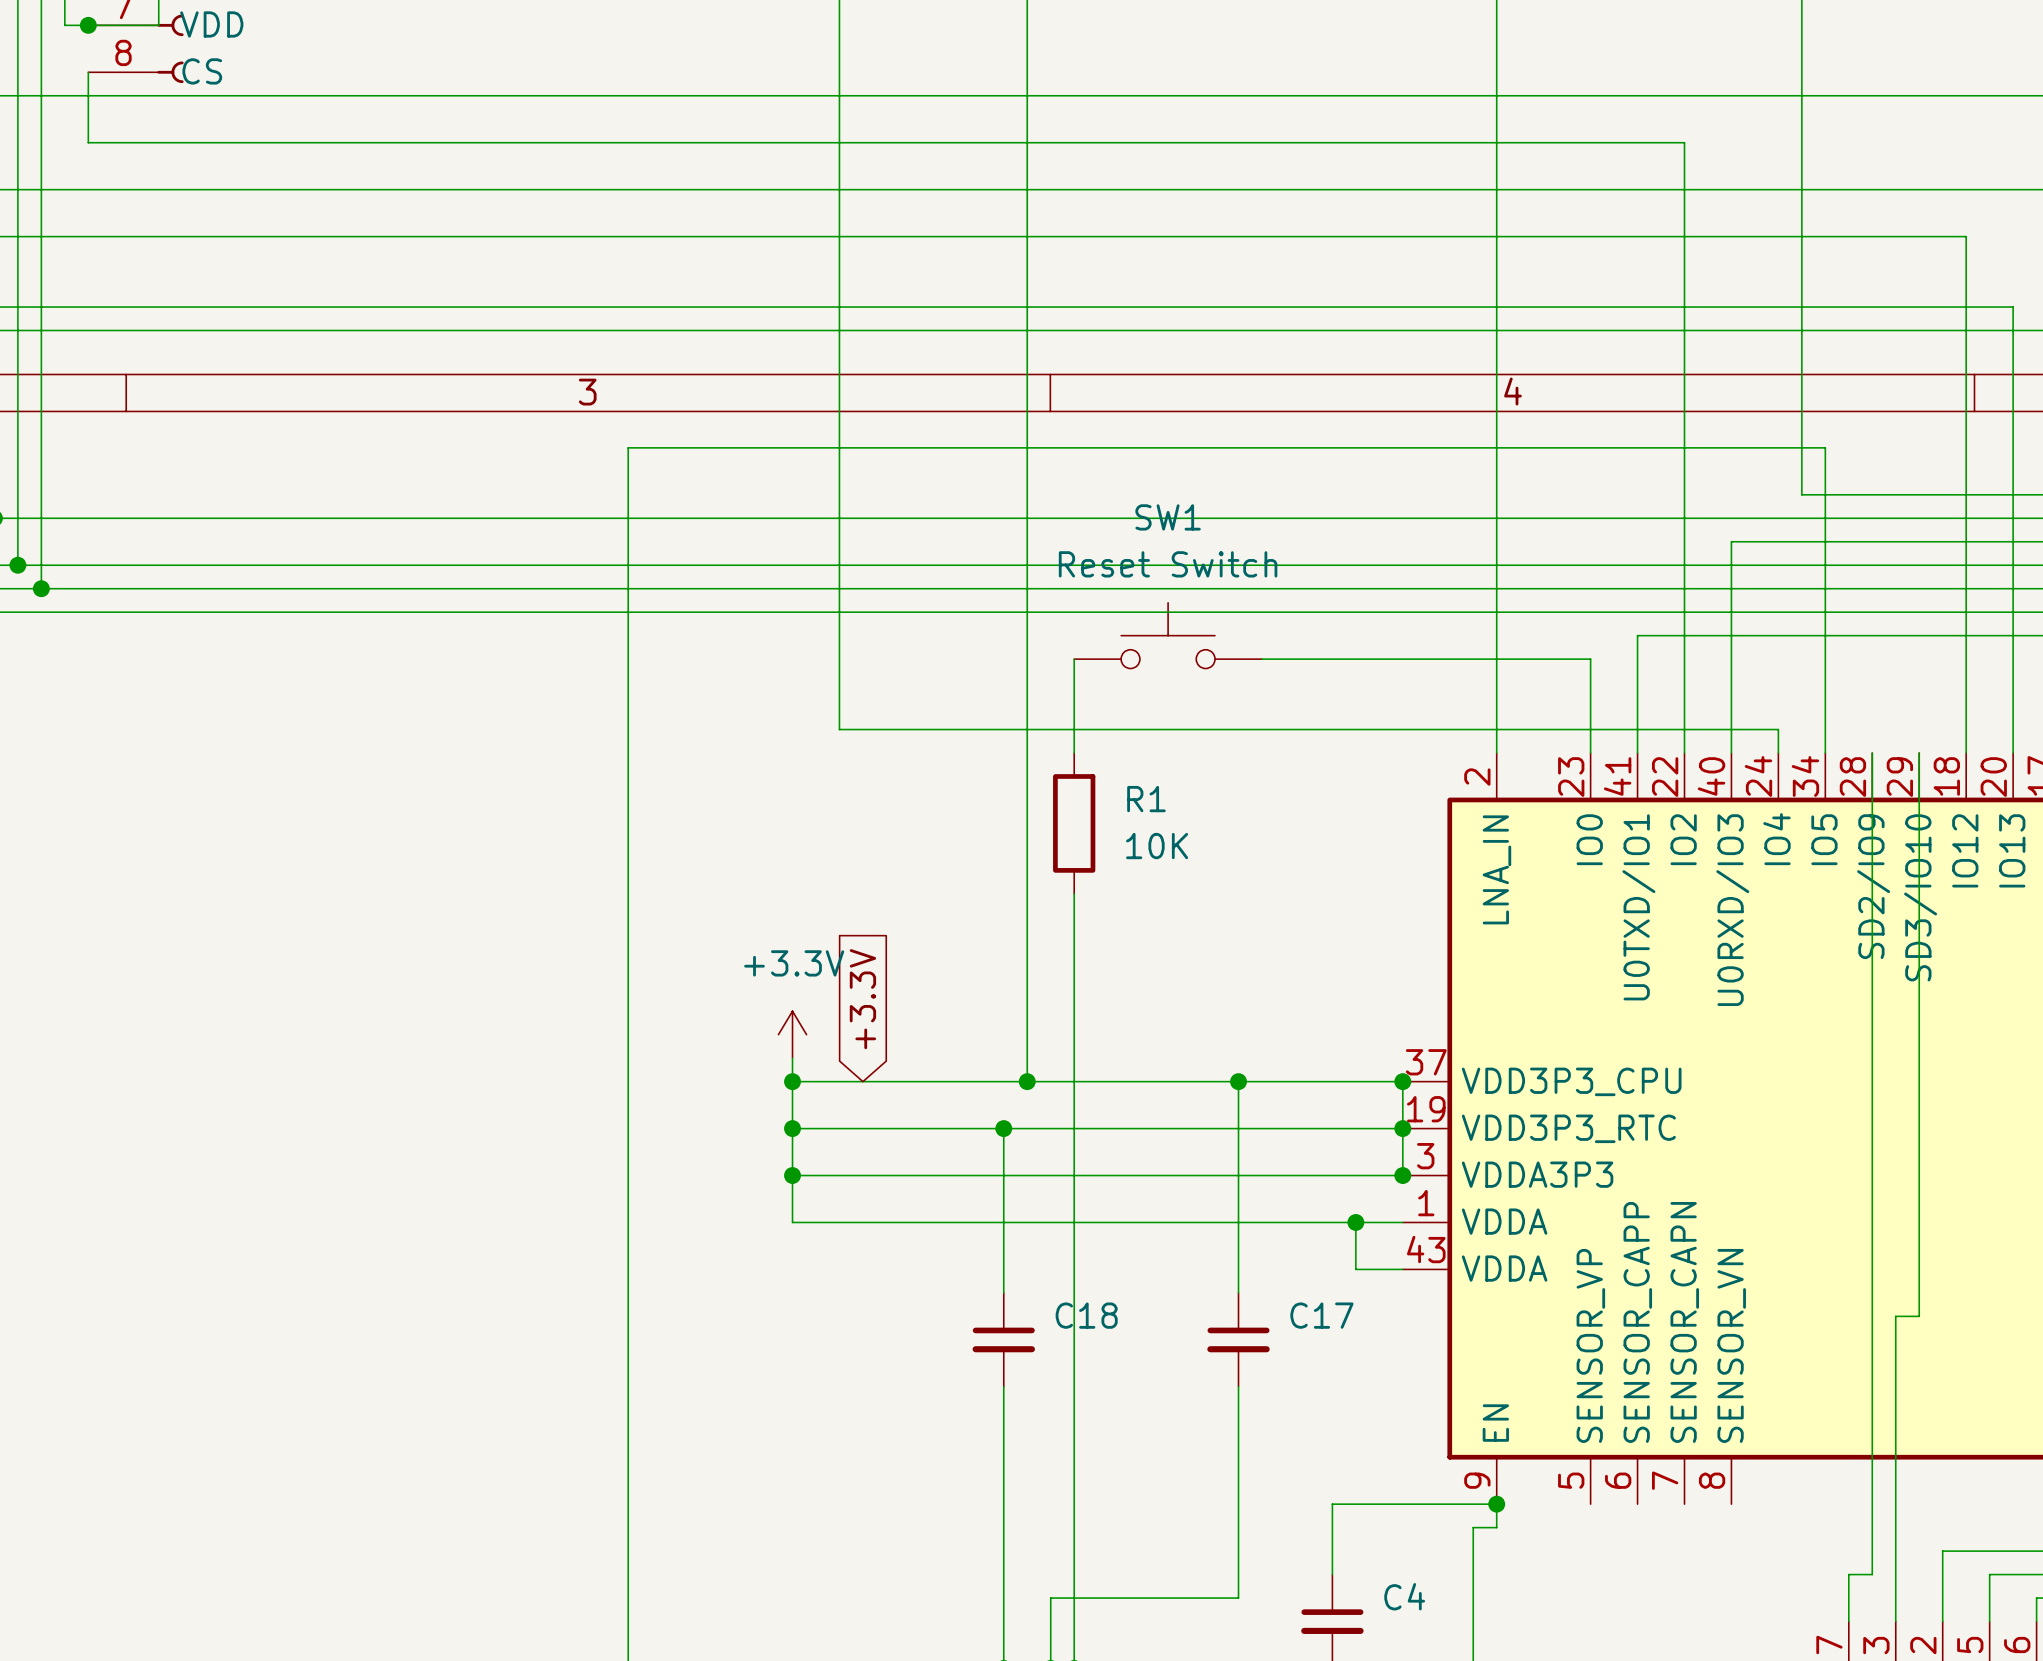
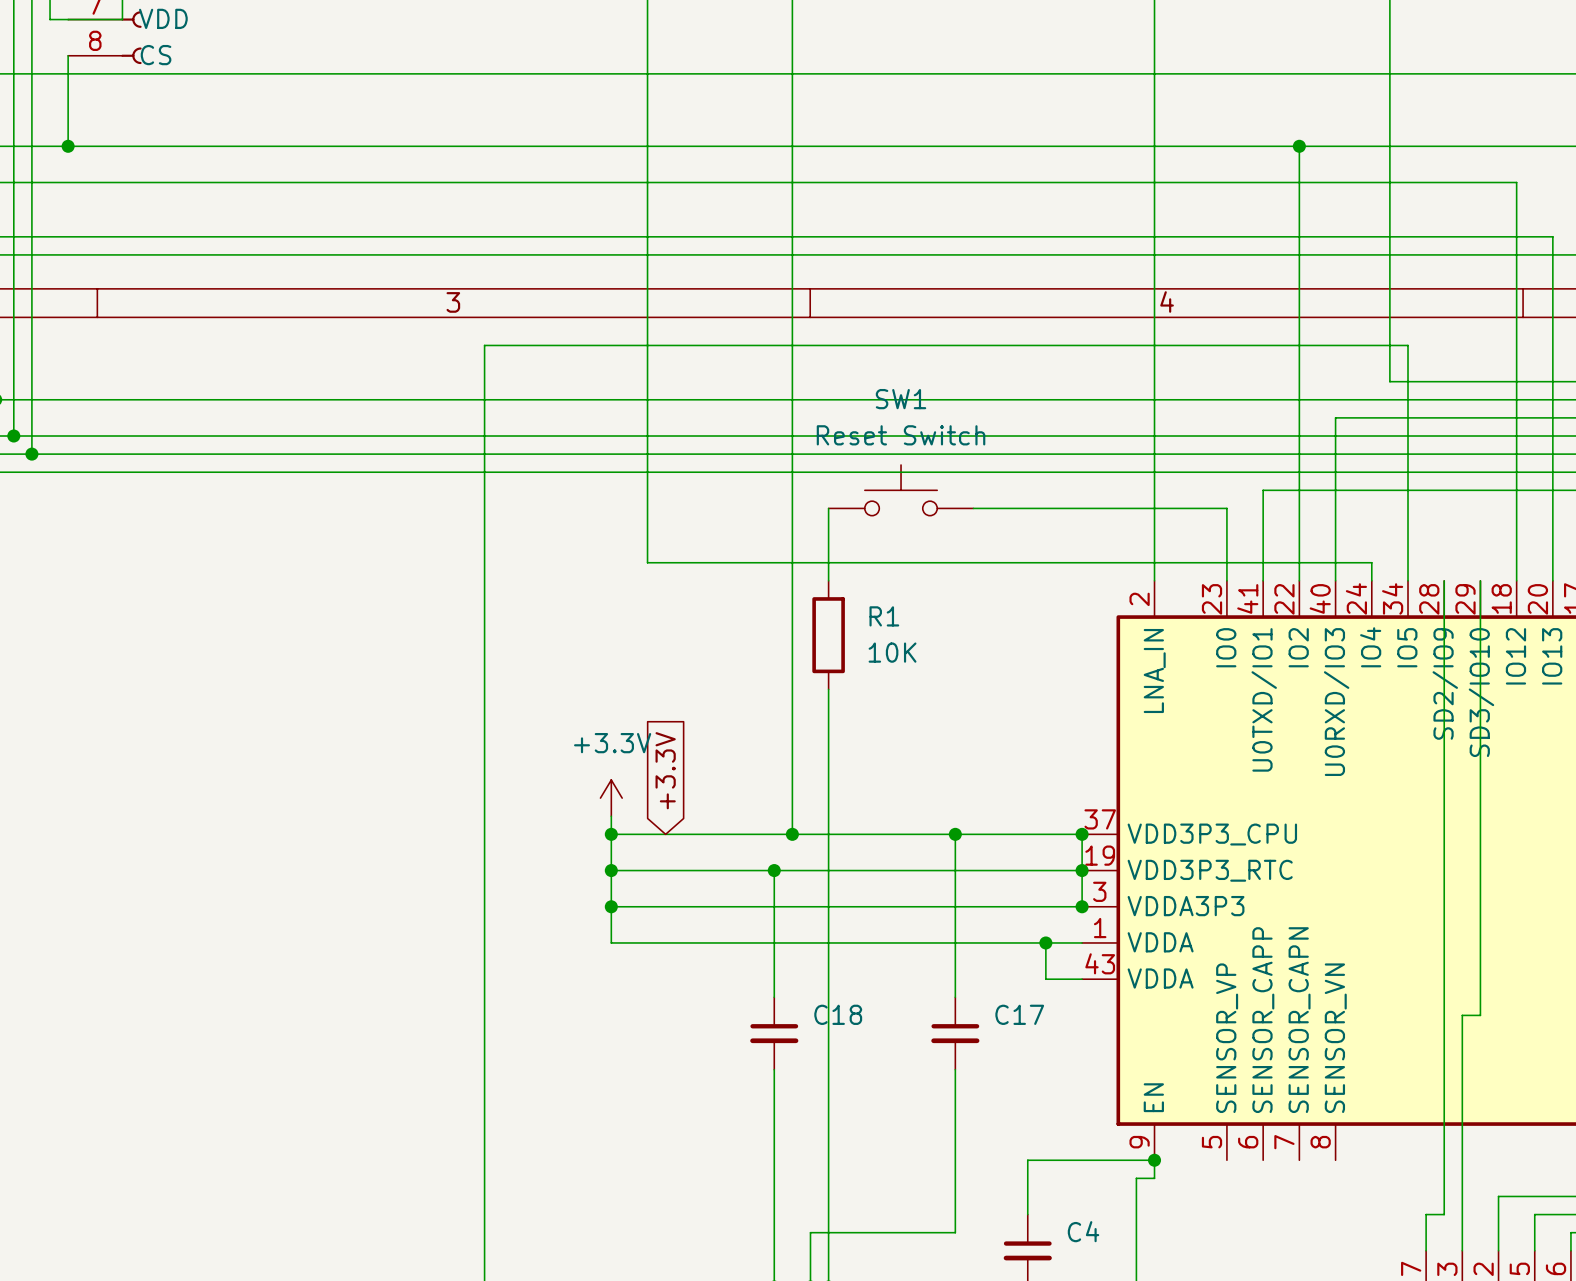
junction: (88, 25) -> none
wire: (88, 142) (1684, 142) (1684, 189) -> (68, 110) (68, 146)
junction: none -> (68, 146)
junction: none -> (1299, 146)

